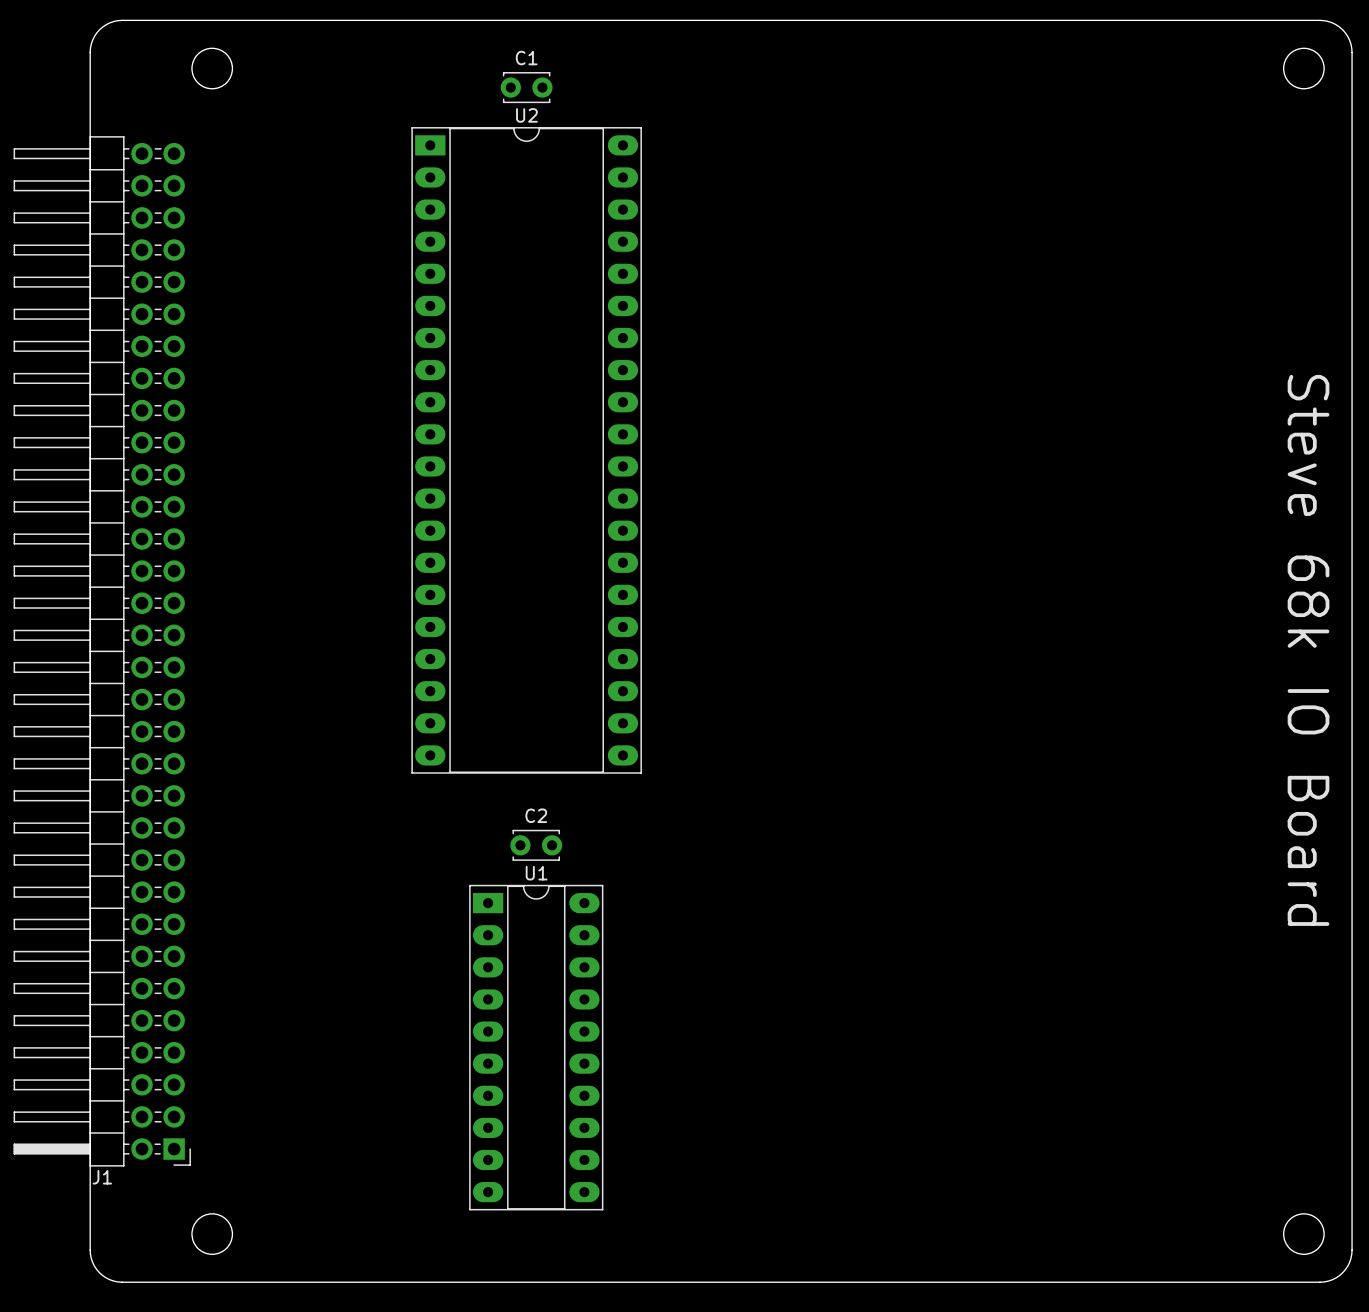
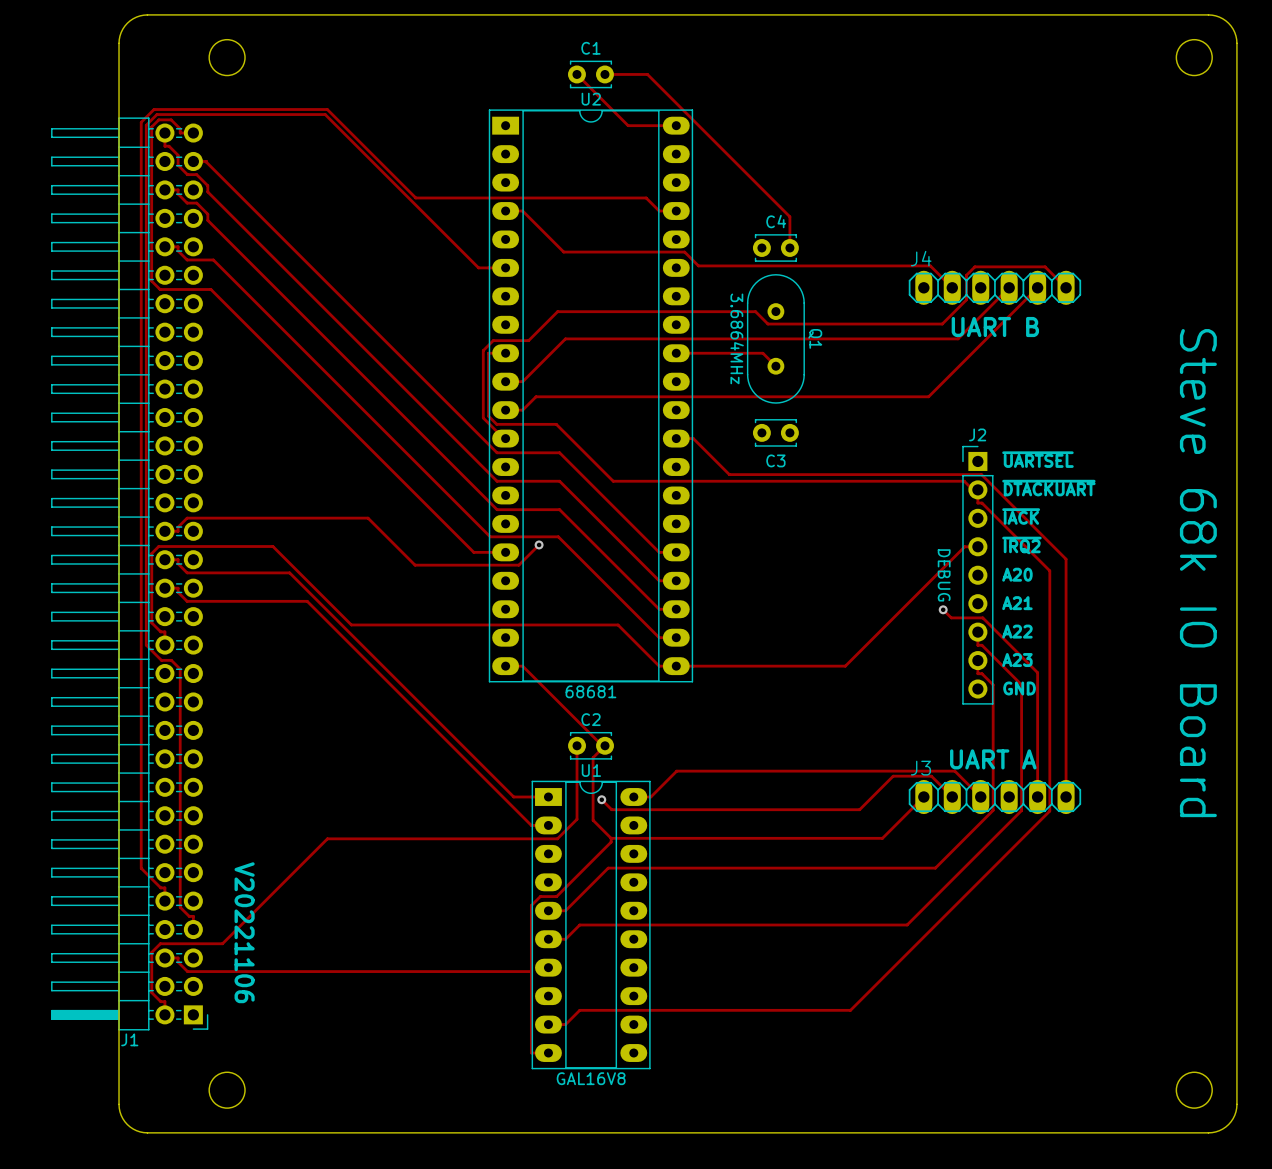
C1 position: (526, 87) -> (590, 74)
track: none -> (576, 74) (628, 125) (676, 125)
track: none -> (604, 74) (647, 74) (789, 216) (789, 247)
track: none -> (164, 133) (164, 146) (169, 146) (178, 155) (178, 165) (187, 174) (196, 174) (207, 185) (207, 191) (497, 481) (559, 481) (659, 580) (676, 580)
track: none -> (193, 133) (180, 133) (180, 128) (171, 119) (158, 119) (151, 127) (151, 281) (160, 289) (210, 289) (473, 552) (505, 552)
track: none -> (193, 161) (206, 161) (497, 452) (559, 452) (659, 552) (676, 552)
track: none -> (164, 189) (178, 189) (178, 194) (187, 203) (196, 203) (207, 214) (207, 220) (497, 509) (559, 509) (659, 609) (676, 609)
track: none -> (505, 211) (522, 211) (563, 252) (684, 252) (698, 265) (930, 265) (952, 287)
track: none -> (676, 211) (659, 211) (646, 197) (415, 197) (327, 109) (154, 109) (141, 122) (141, 868) (160, 887) (164, 887) (164, 901)
track: none -> (164, 246) (178, 246) (178, 250) (187, 259) (213, 259) (490, 536) (558, 536) (659, 637) (676, 637)
C4: none -> (775, 247)
track: none -> (505, 267) (478, 267) (325, 114) (156, 114) (146, 125) (146, 645) (161, 660) (171, 660) (180, 669) (180, 907) (189, 916) (193, 916) (193, 929)
J4: none -> (994, 287)
track: none -> (1009, 287) (958, 338) (565, 338) (522, 381) (505, 381)
track: none -> (1037, 287) (928, 396) (536, 396) (522, 410) (505, 410)
track: none -> (1066, 287) (1045, 266) (974, 266) (966, 275) (966, 299) (942, 324) (767, 324) (755, 311) (557, 311) (528, 340) (493, 340) (483, 350) (483, 417) (505, 438)
text: none -> UART B (995, 327)
Q1: none -> 3.6864MHz (775, 338)
track: none -> (505, 353) (488, 353) (488, 416) (496, 424) (556, 424) (613, 481) (964, 481) (977, 494)
track: none -> (676, 353) (762, 353) (775, 366)
U2 position: (526, 450) -> (590, 395)
C3: none -> (775, 432)
track: none -> (676, 438) (693, 438) (729, 474) (981, 474) (1066, 559) (1066, 796)
text: none -> ~{UARTSEL} (1037, 459)
text: none -> ~{DTACKUART} (1048, 488)
track: none -> (977, 489) (977, 503) (981, 503) (1049, 570) (1049, 811) (850, 1010) (579, 1010) (565, 1024) (548, 1024)
text: none -> ~{IACK} (1021, 516)
track: none -> (164, 531) (178, 531) (178, 527) (187, 518) (368, 518) (415, 565) (518, 565) (539, 544)
via: none -> (539, 544)
text: none -> ~{IRQ2} (1021, 545)
track: none -> (977, 546) (964, 546) (845, 666) (659, 666) (618, 624) (351, 624) (272, 546) (158, 546) (151, 553) (151, 622) (160, 631) (164, 631) (164, 645)
track: none -> (164, 559) (178, 559) (178, 563) (187, 572) (289, 572) (513, 796) (548, 796)
J2: none -> DEBUG (977, 575)
text: none -> A20 (1017, 574)
track: none -> (164, 588) (178, 588) (178, 592) (187, 601) (307, 601) (531, 825) (548, 825)
text: none -> A21 (1017, 603)
track: none -> (943, 609) (951, 617) (982, 617) (1037, 672) (1037, 796)
via: none -> (943, 609)
text: none -> A22 (1017, 631)
track: none -> (977, 632) (977, 645) (981, 645) (1021, 684) (1021, 810) (907, 925) (579, 925) (565, 939) (548, 939)
text: none -> A23 (1017, 660)
track: none -> (977, 660) (977, 673) (981, 673) (993, 684) (993, 810) (935, 868) (608, 868) (565, 910) (548, 910)
track: none -> (505, 666) (522, 666) (603, 747)
text: none -> GND (1019, 688)
U2 value: none -> 68681 (590, 691)
C2 position: (536, 845) -> (591, 745)
track: none -> (577, 745) (577, 819) (557, 838) (327, 838) (222, 943) (160, 943) (151, 952) (151, 992) (160, 1001) (164, 1001) (164, 1014)
track: none -> (605, 745) (593, 757) (593, 820) (611, 838)
text: none -> UART A (993, 759)
track: none -> (633, 796) (650, 796) (676, 771) (954, 771) (980, 796)
track: none -> (923, 796) (882, 838) (611, 838)
track: none -> (952, 796) (931, 776) (893, 776) (859, 809) (611, 809) (601, 799)
J3: none -> (994, 796)
via: none -> (601, 799)
track: none -> (611, 838) (611, 842) (556, 896) (540, 896) (531, 905) (531, 1053) (548, 1053)
U1 position: (536, 1047) -> (591, 925)
text: none -> V20221106 (244, 932)
track: none -> (164, 957) (178, 957) (178, 962) (187, 971) (531, 971)
U1 value: none -> GAL16V8 (591, 1078)

